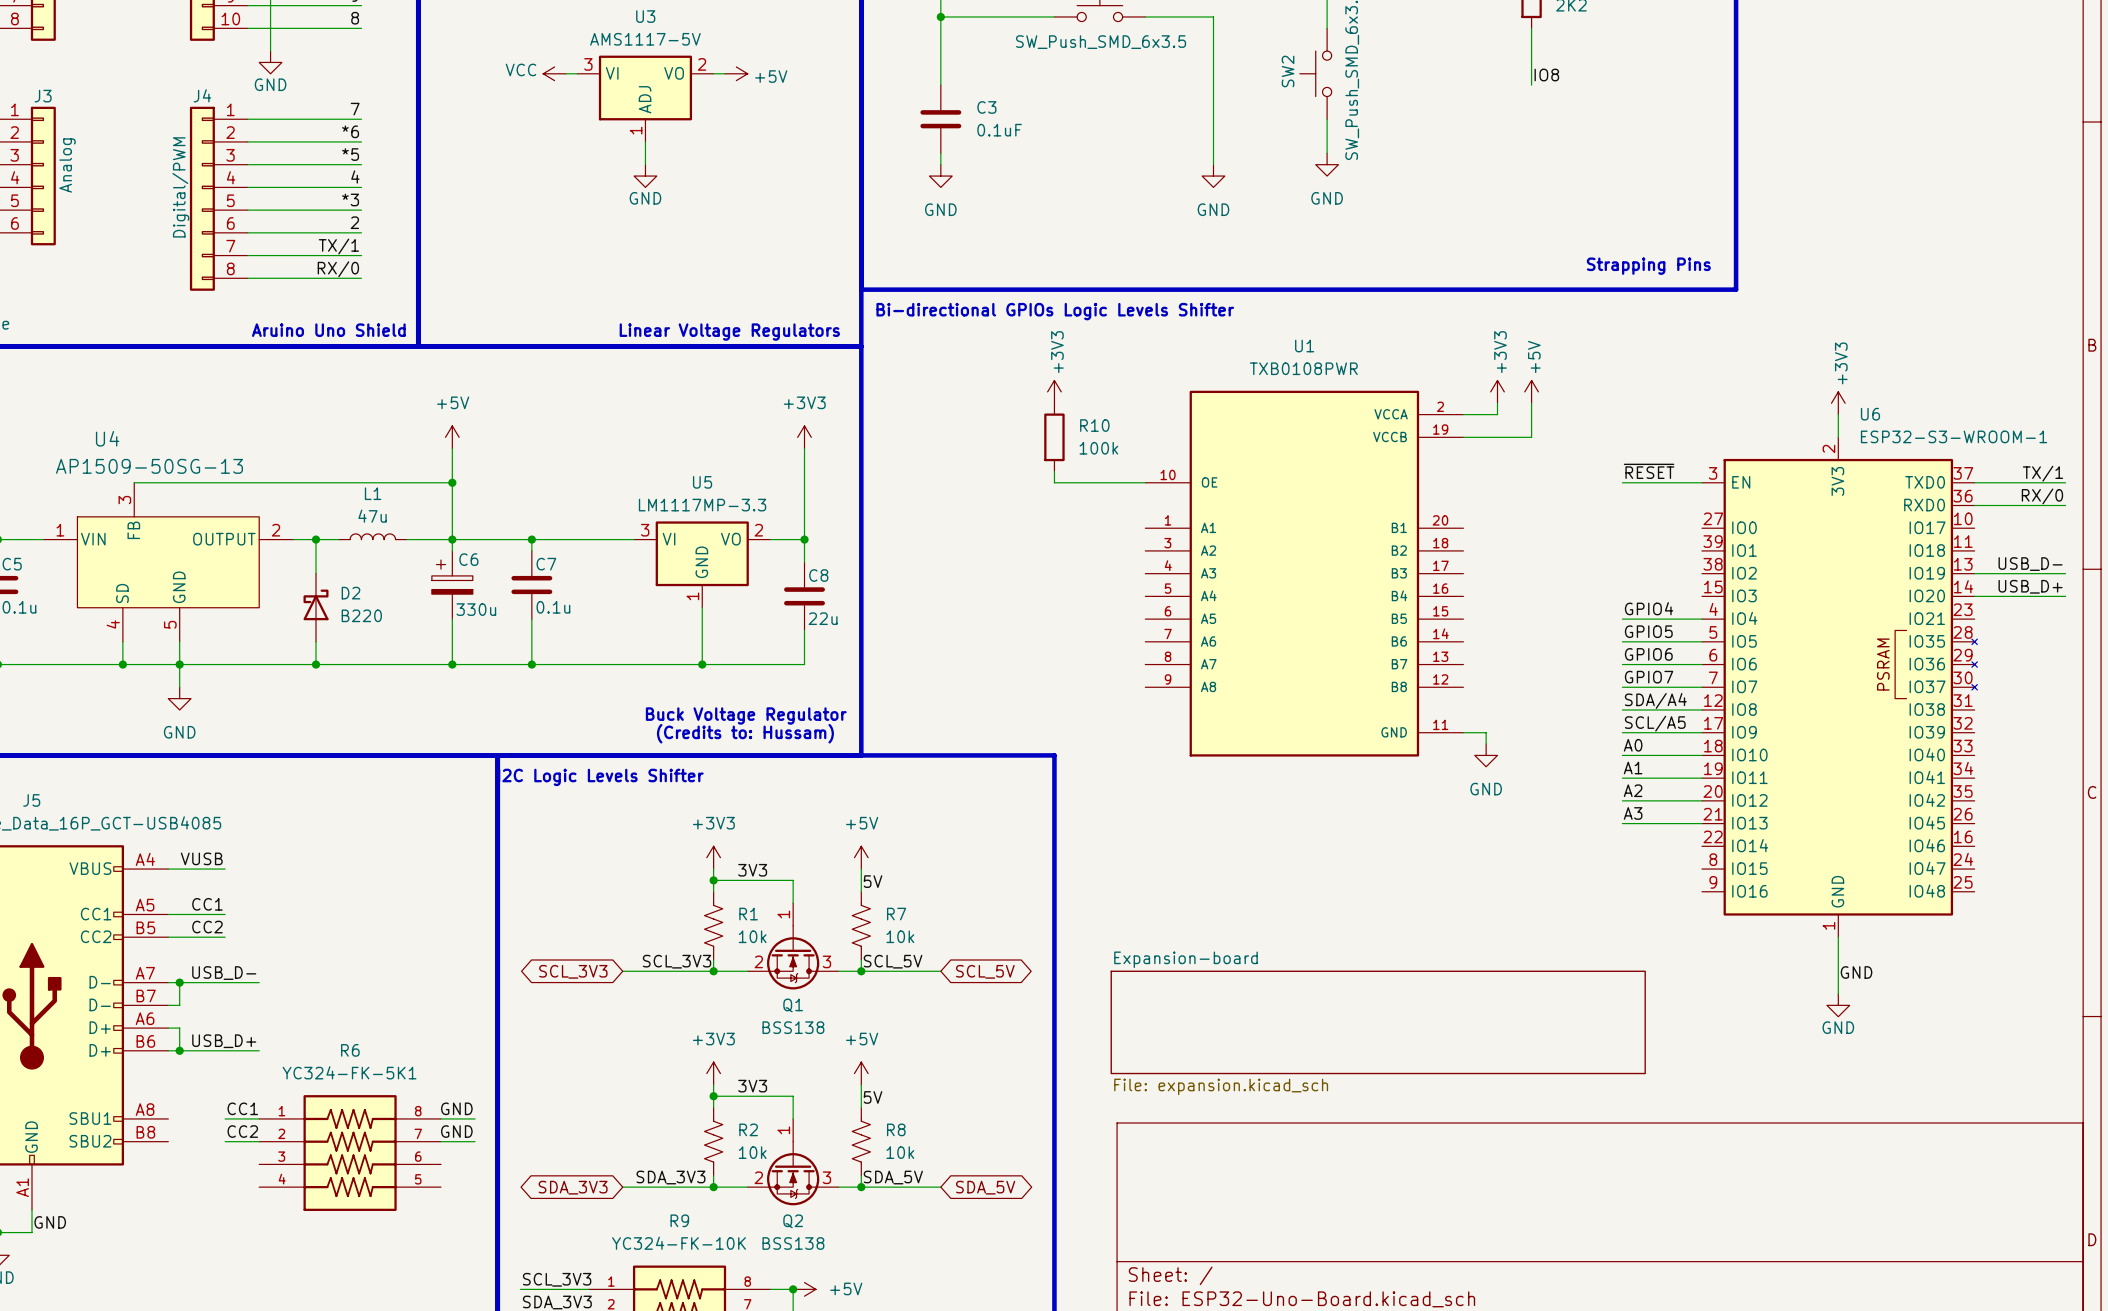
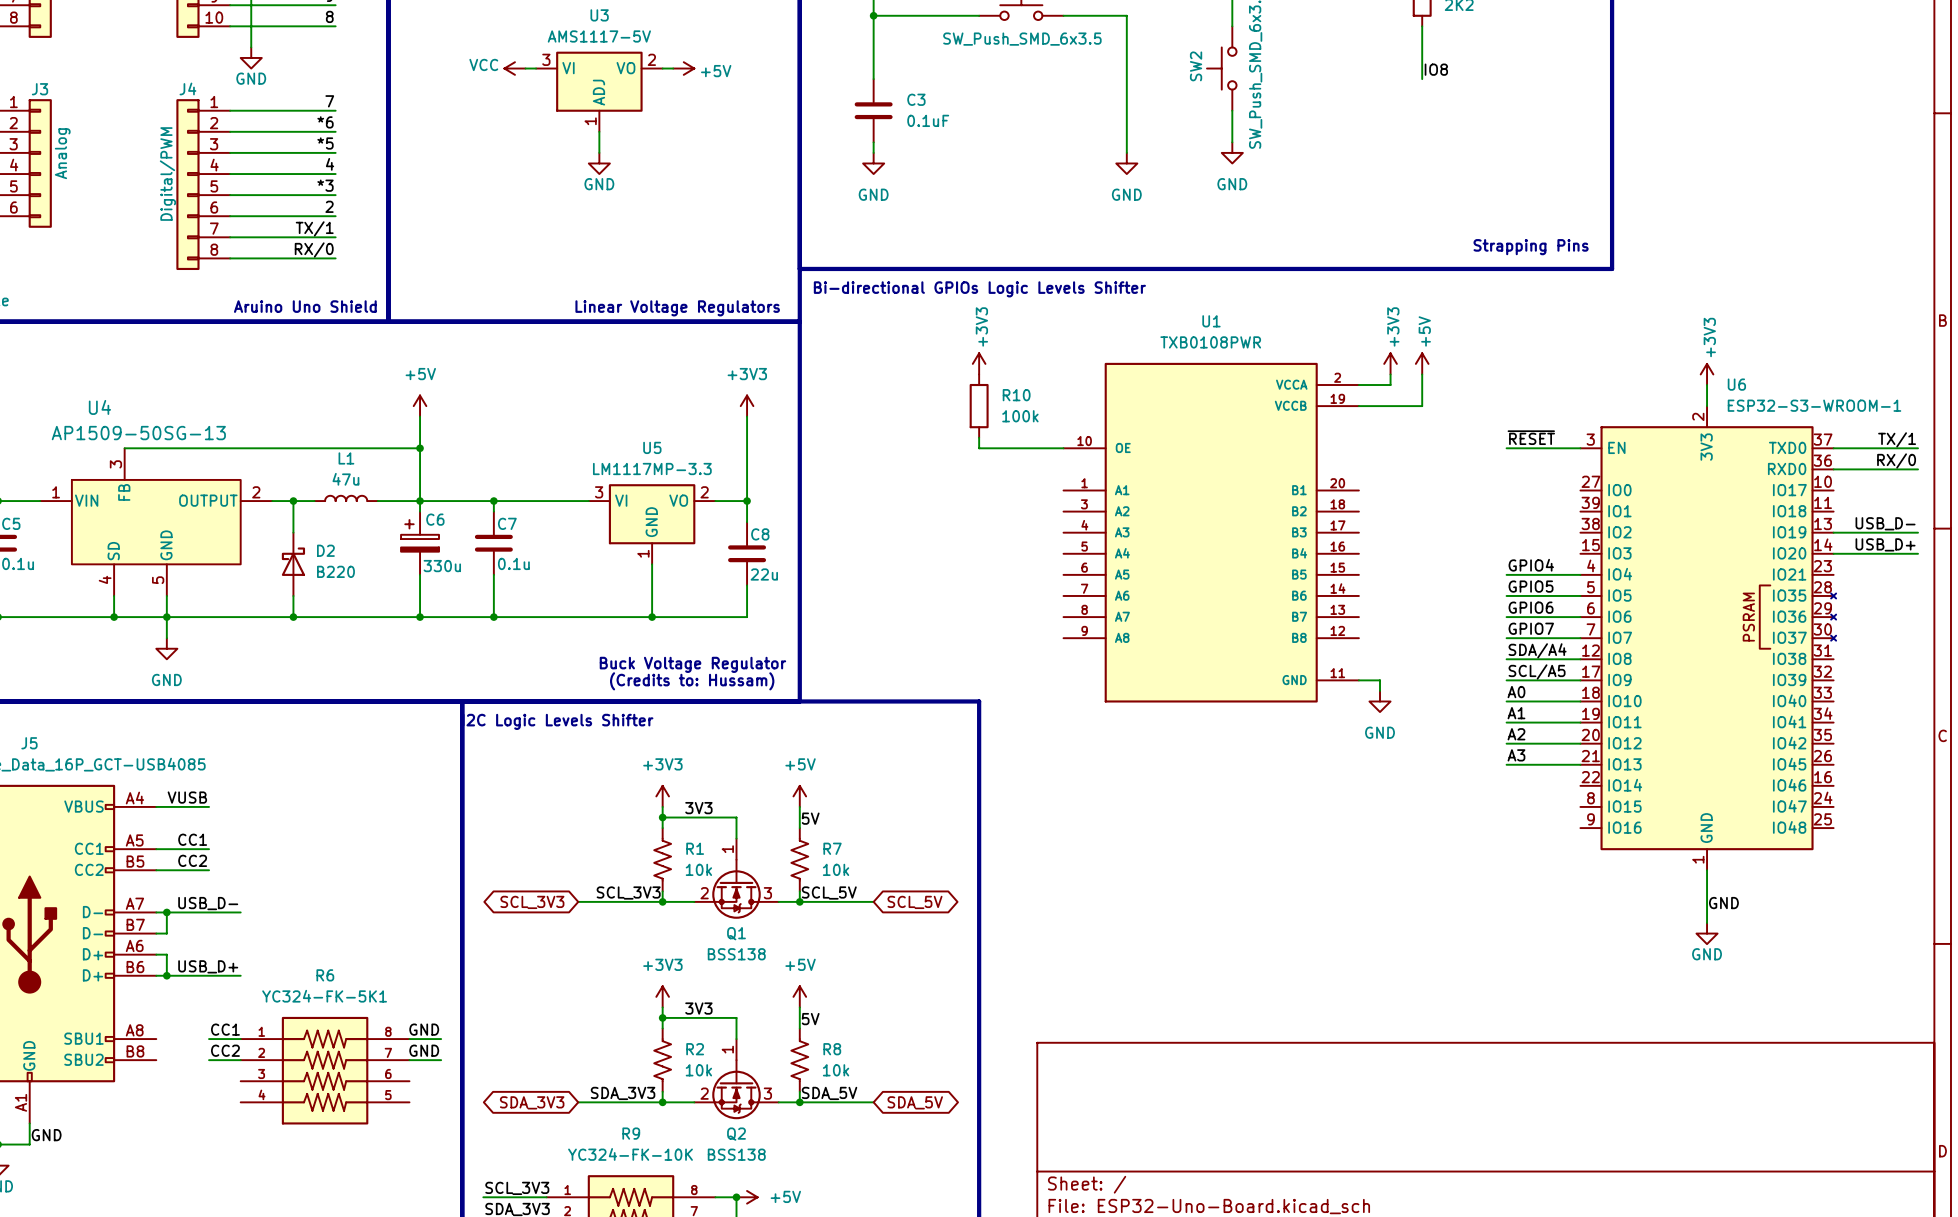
sheet Expansion-board: File: expansion.kicad_sch (1378, 1022) -> none

